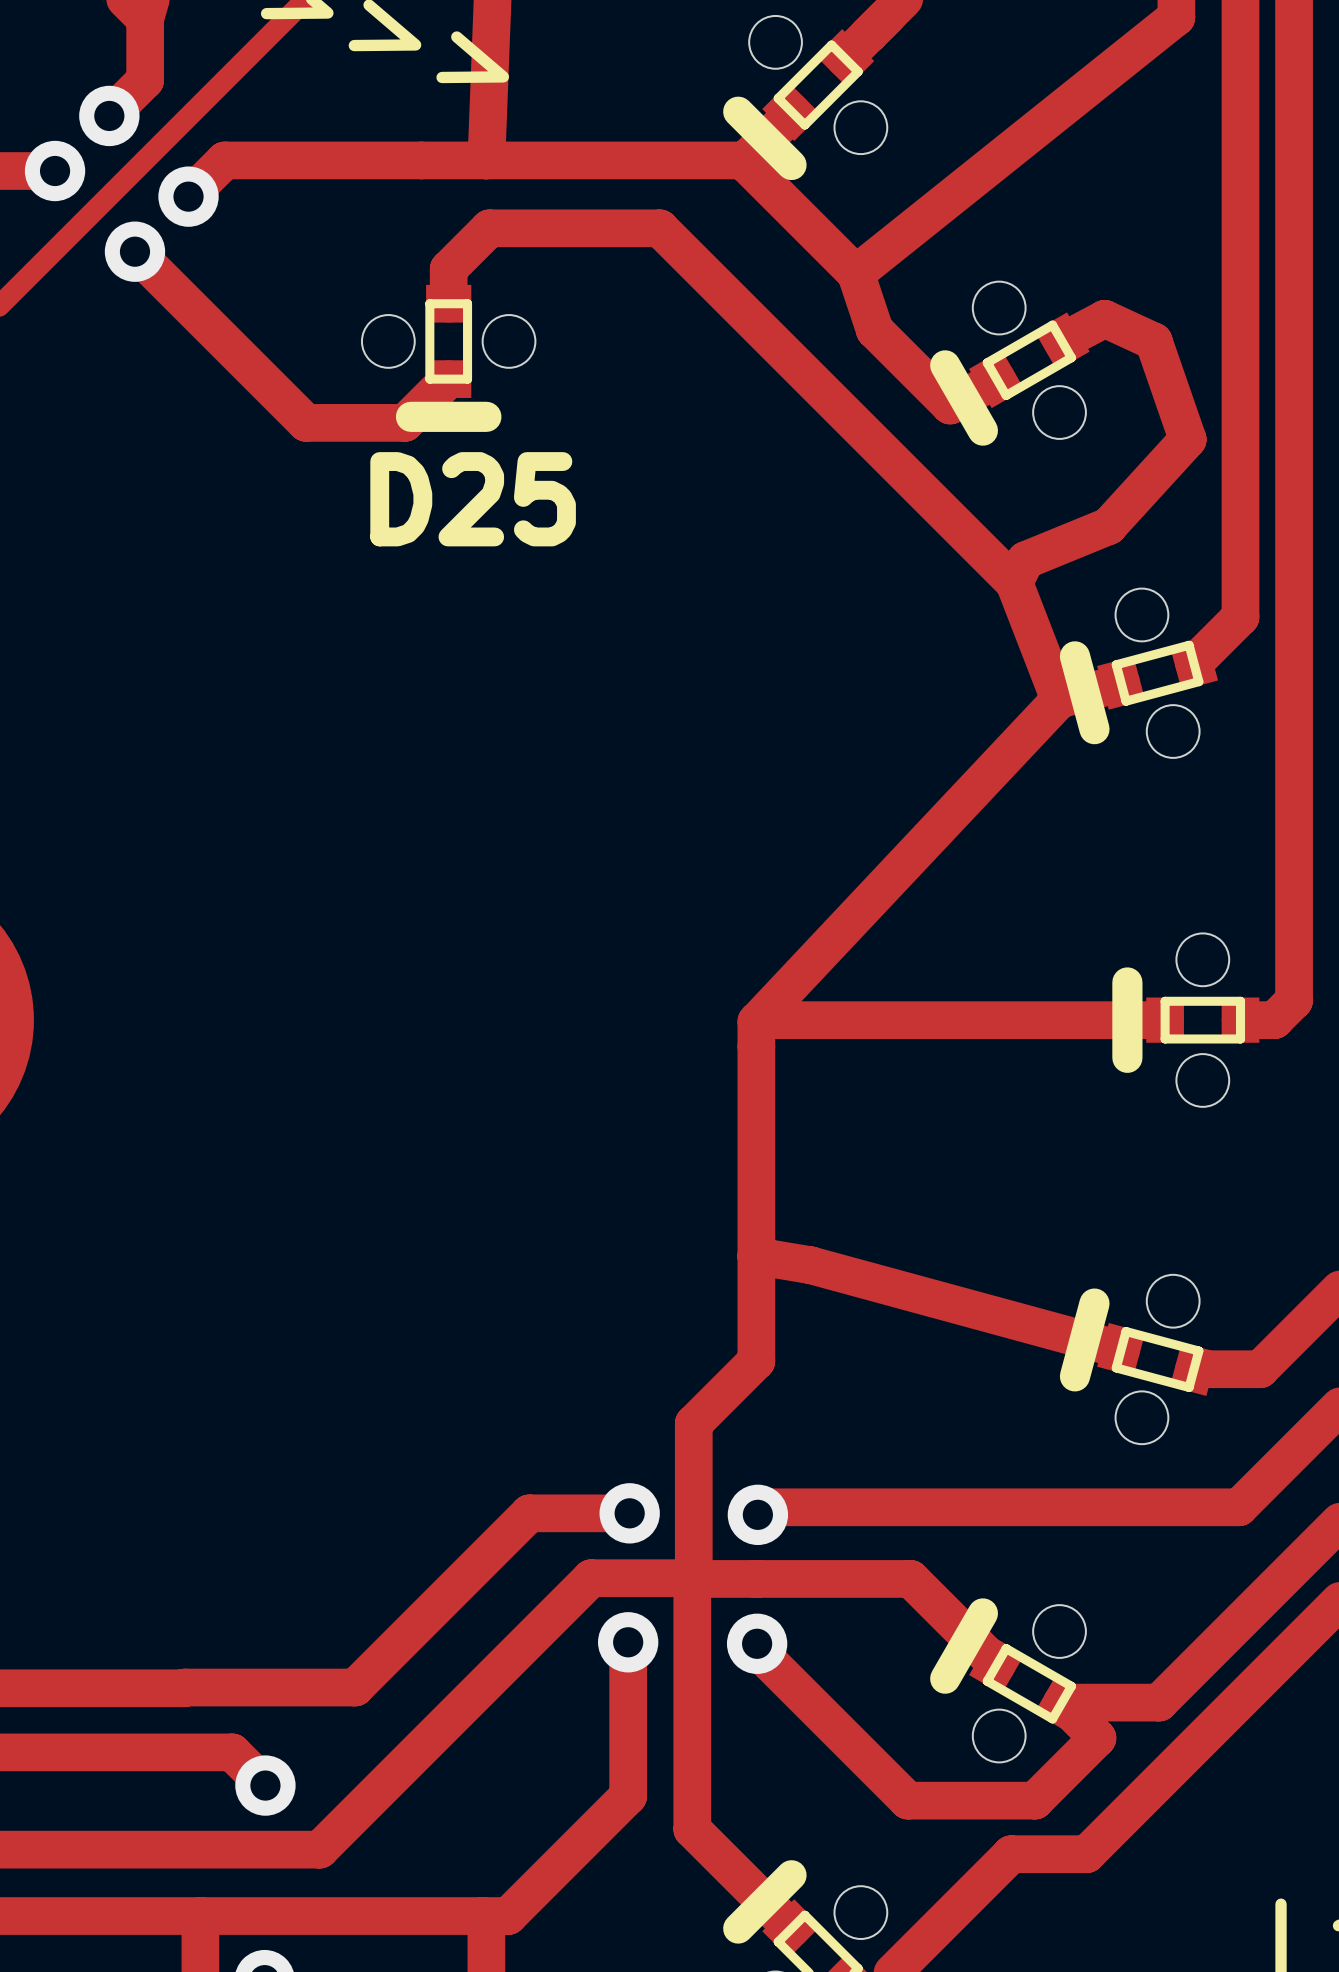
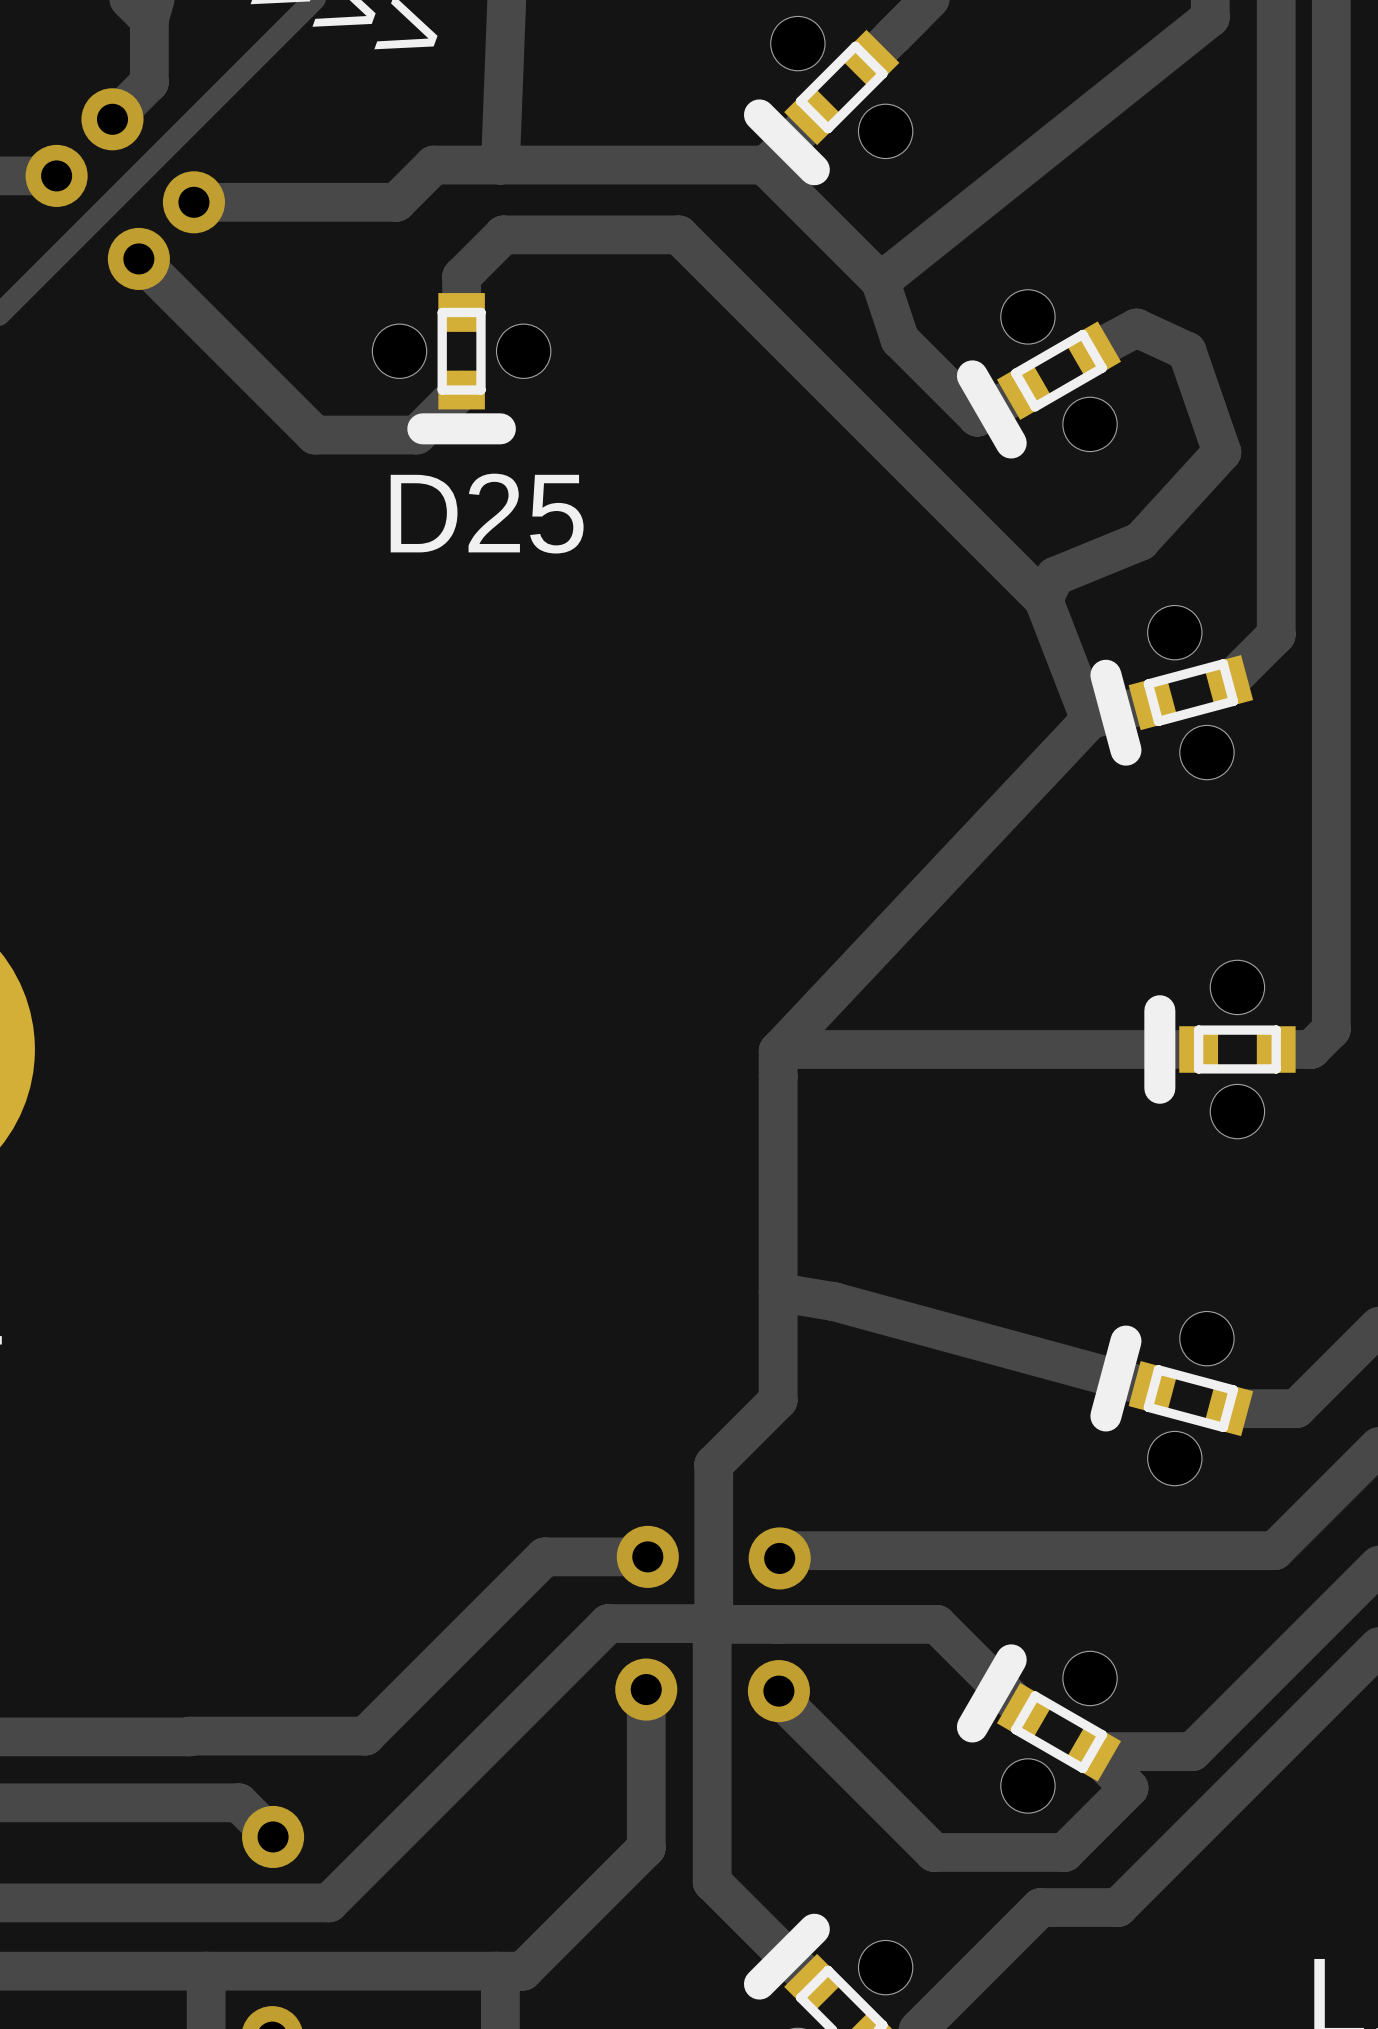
track: (421, 160) (224, 160) (188, 196) -> (433, 165) (396, 202) (193, 202)

